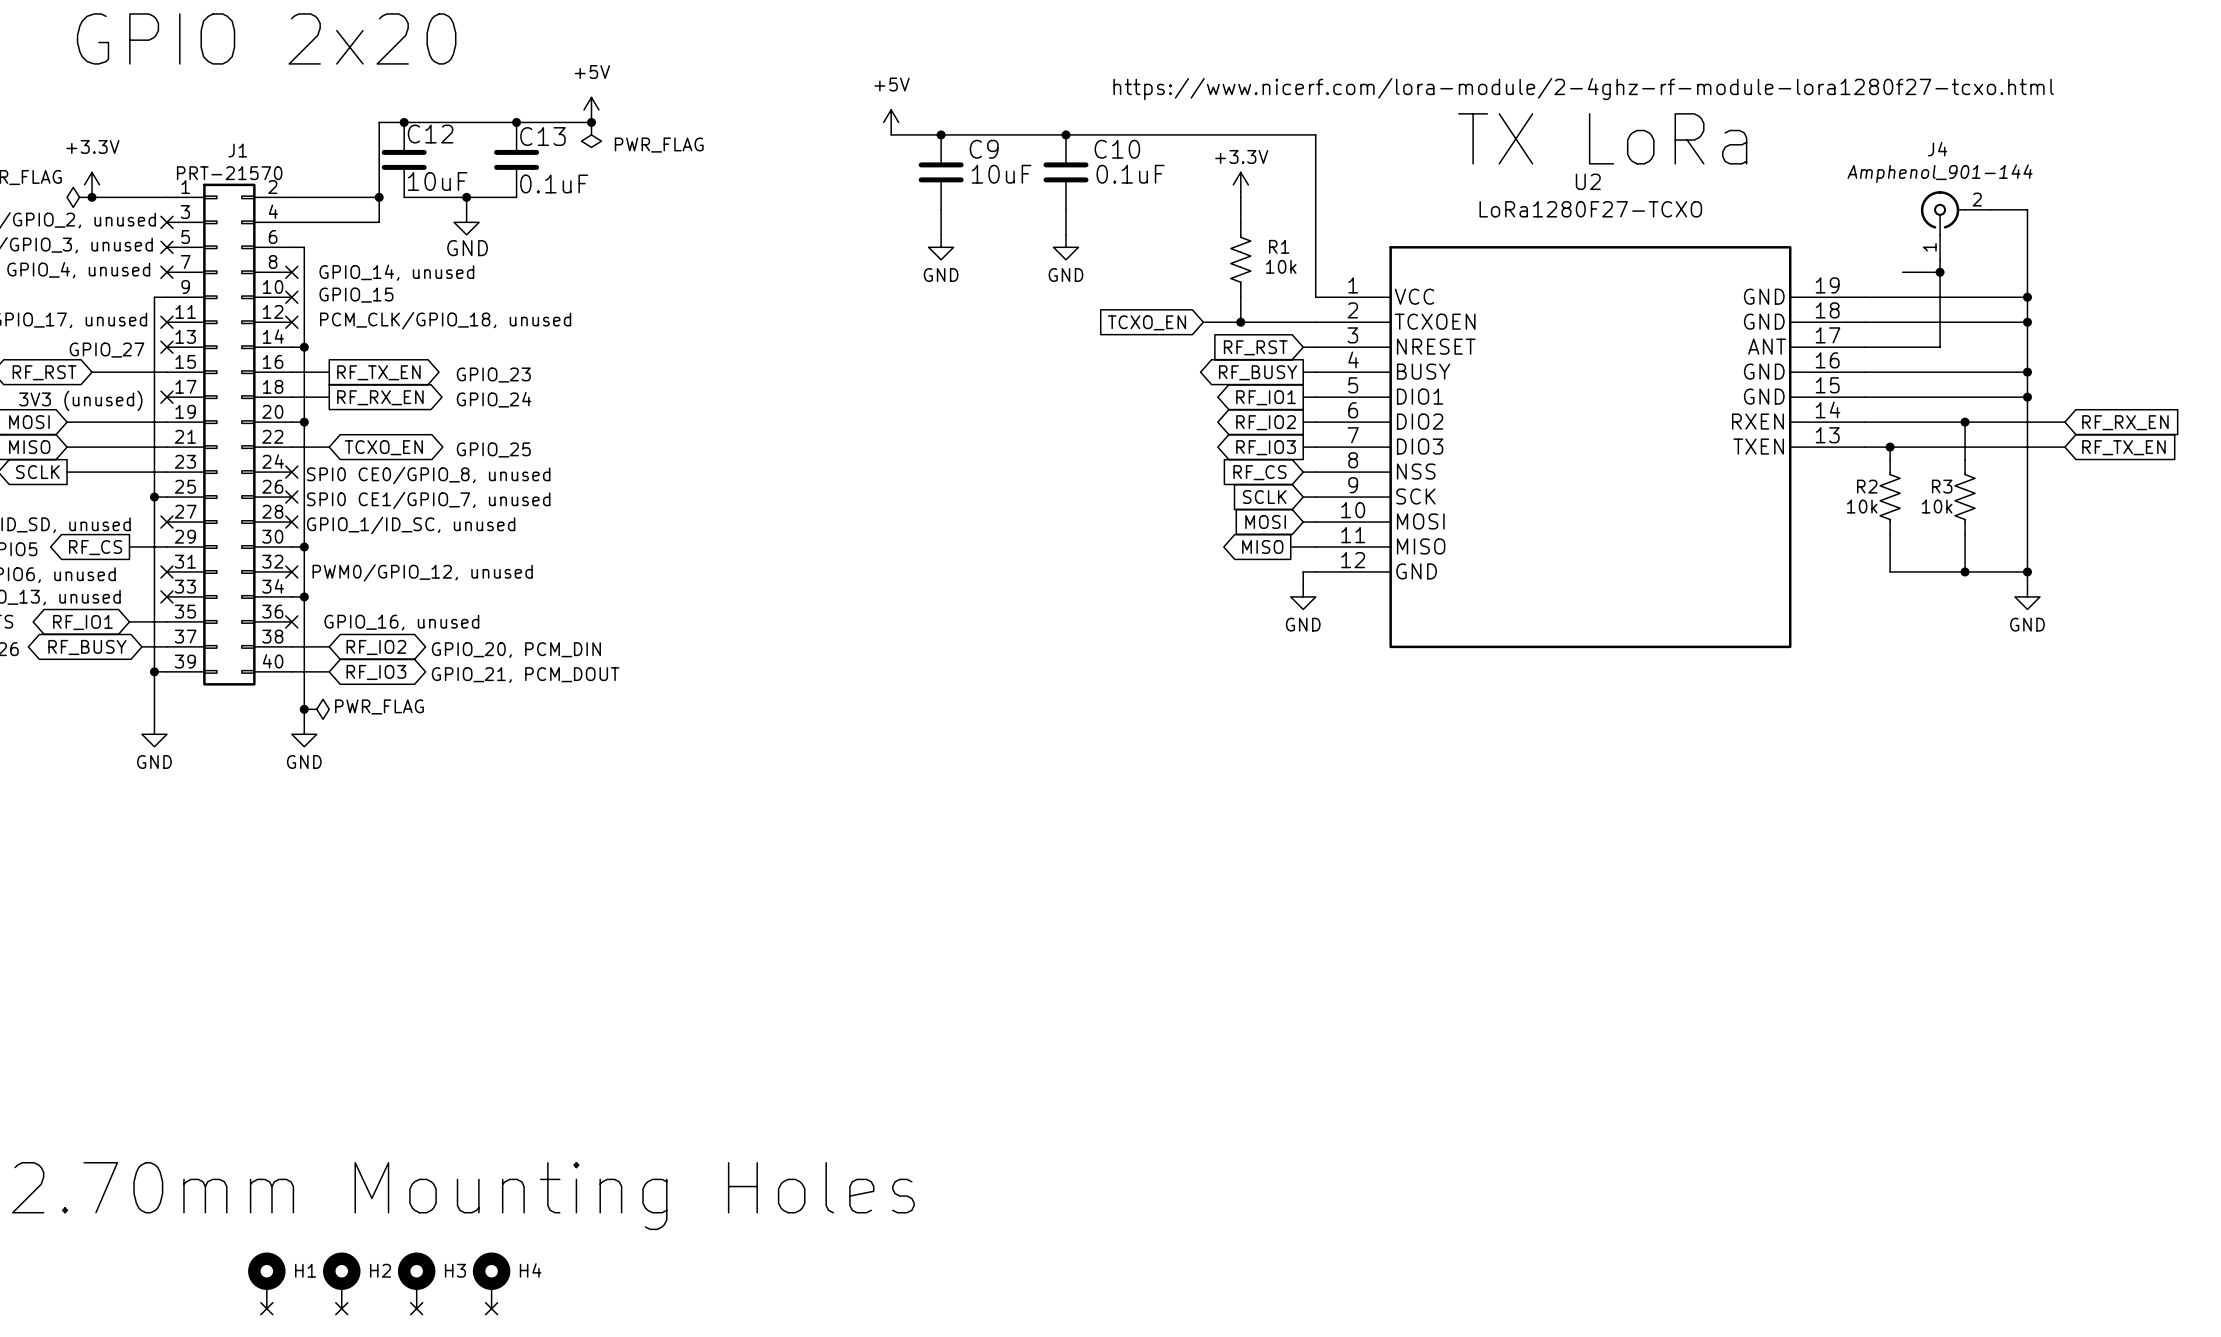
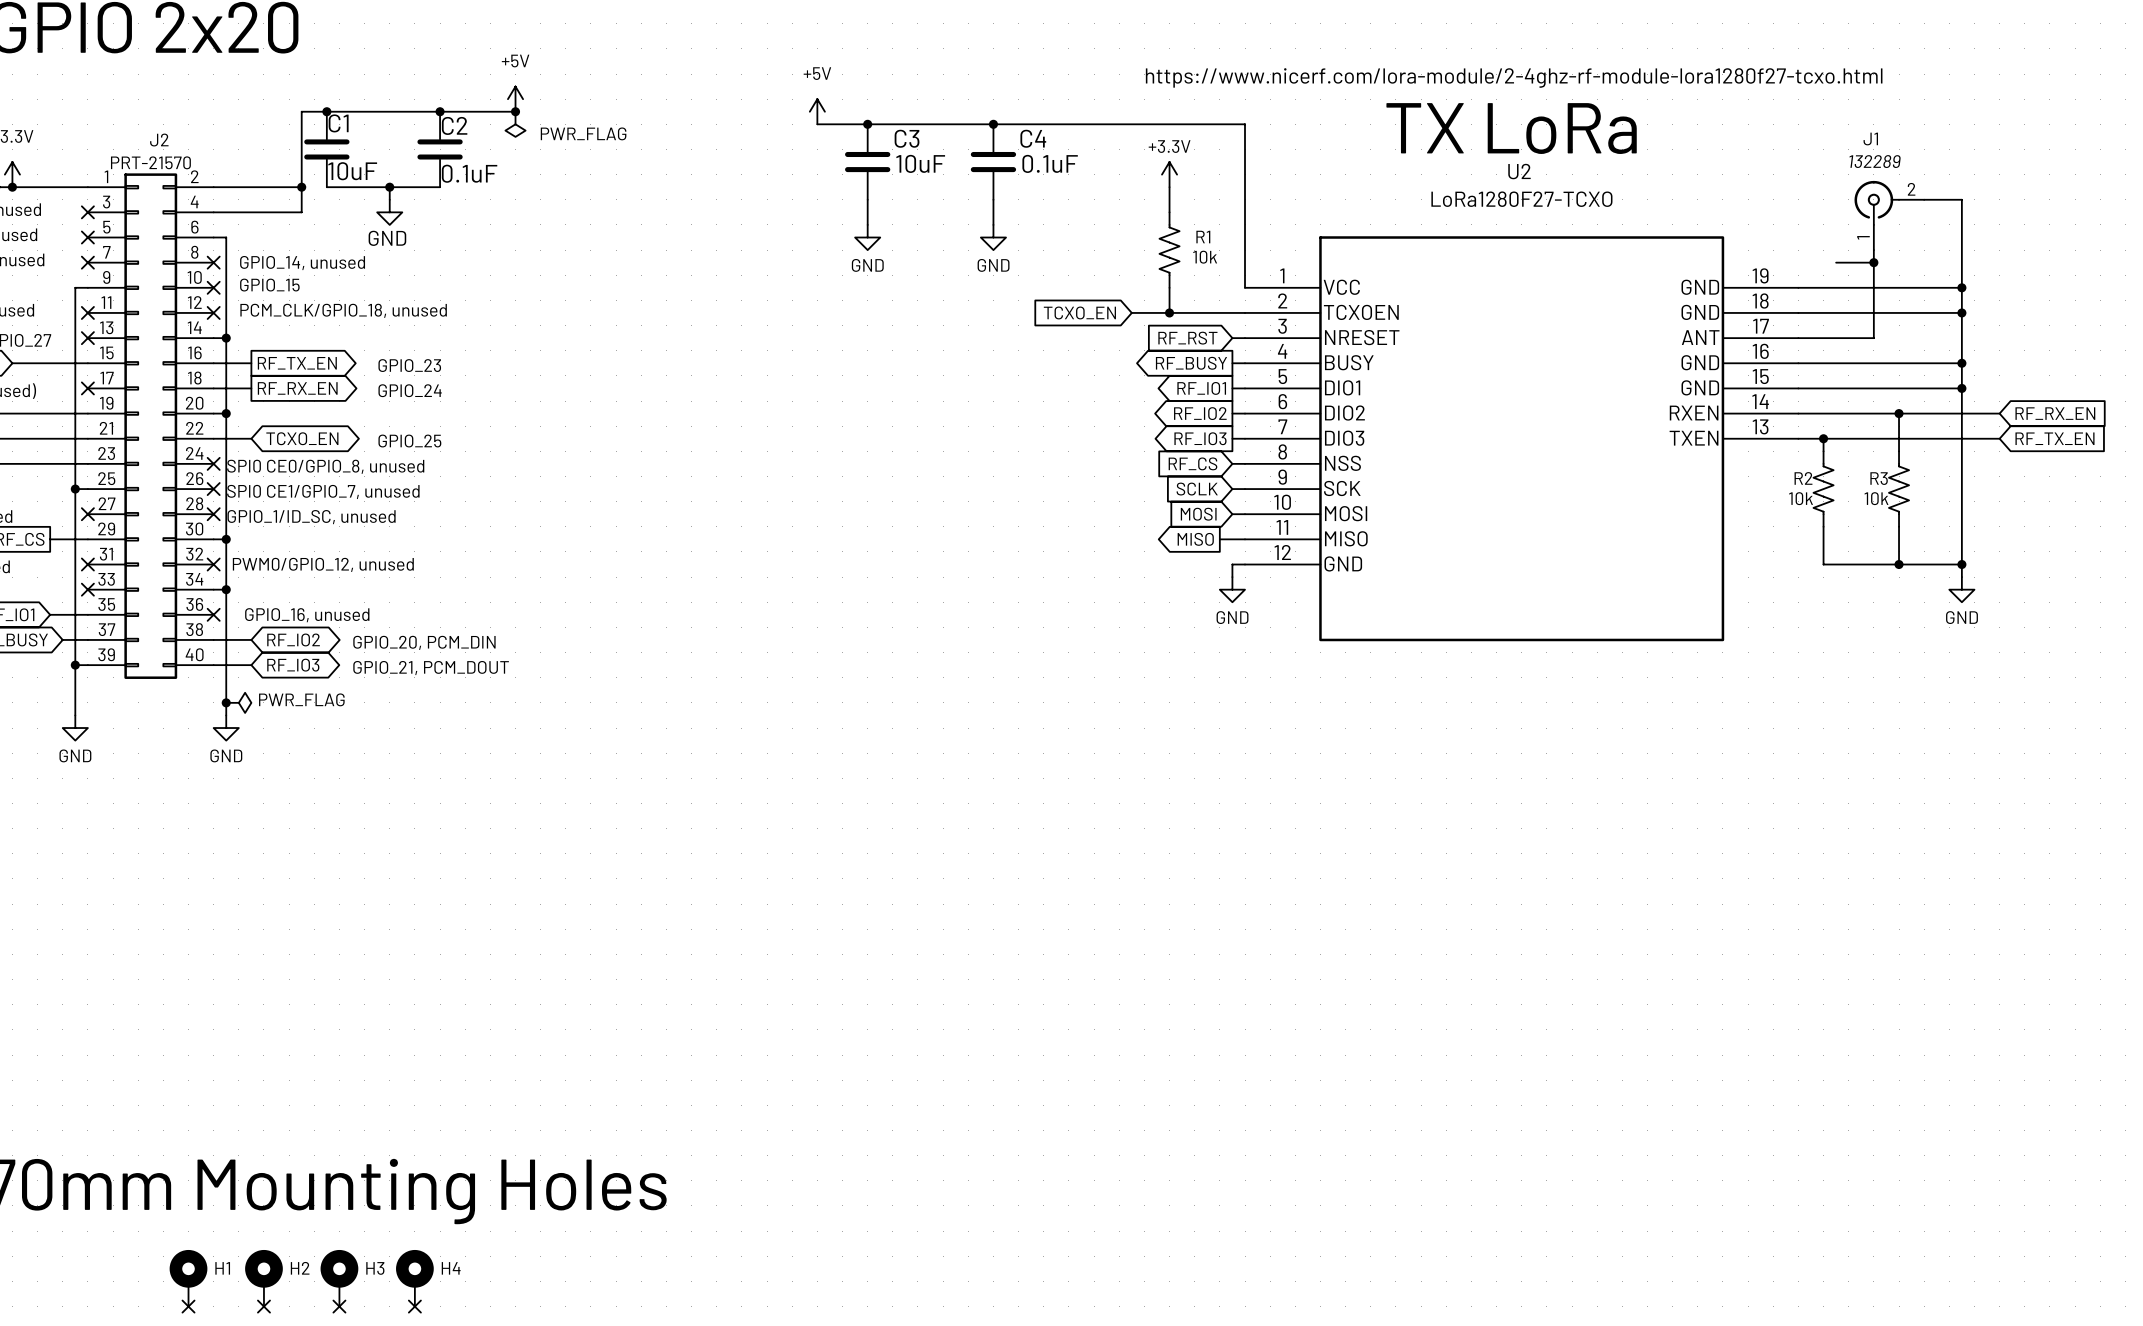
C12 name: C12 (430, 134) -> C1 (338, 123)
C13 name: C13 (542, 136) -> C2 (454, 125)
C9 name: C9 (984, 149) -> C3 (907, 138)
C10 name: C10 (1117, 149) -> C4 (1033, 138)
J4 name: J4 (1937, 149) -> J1 (1870, 139)
J1 name: J1 (237, 150) -> J2 (159, 140)
J4 value: Amphenol_901-144 (1940, 173) -> 132289 (1875, 161)

